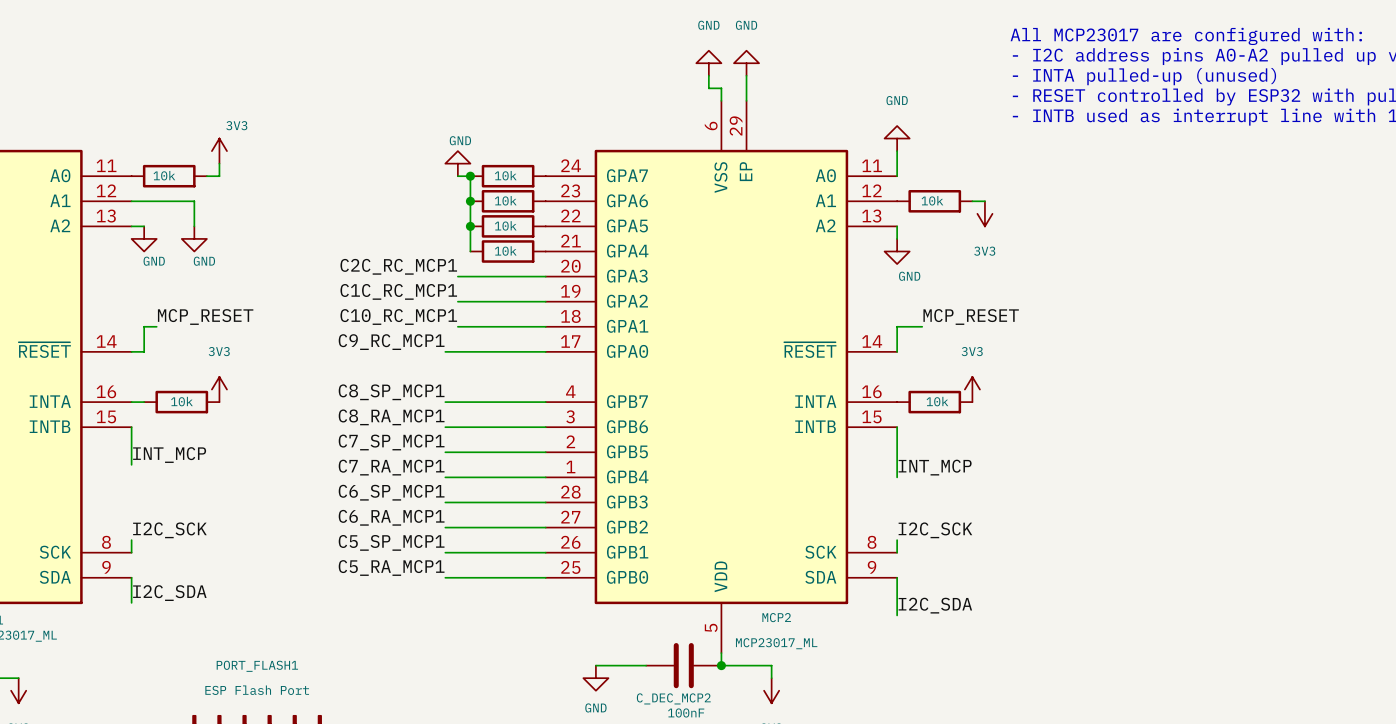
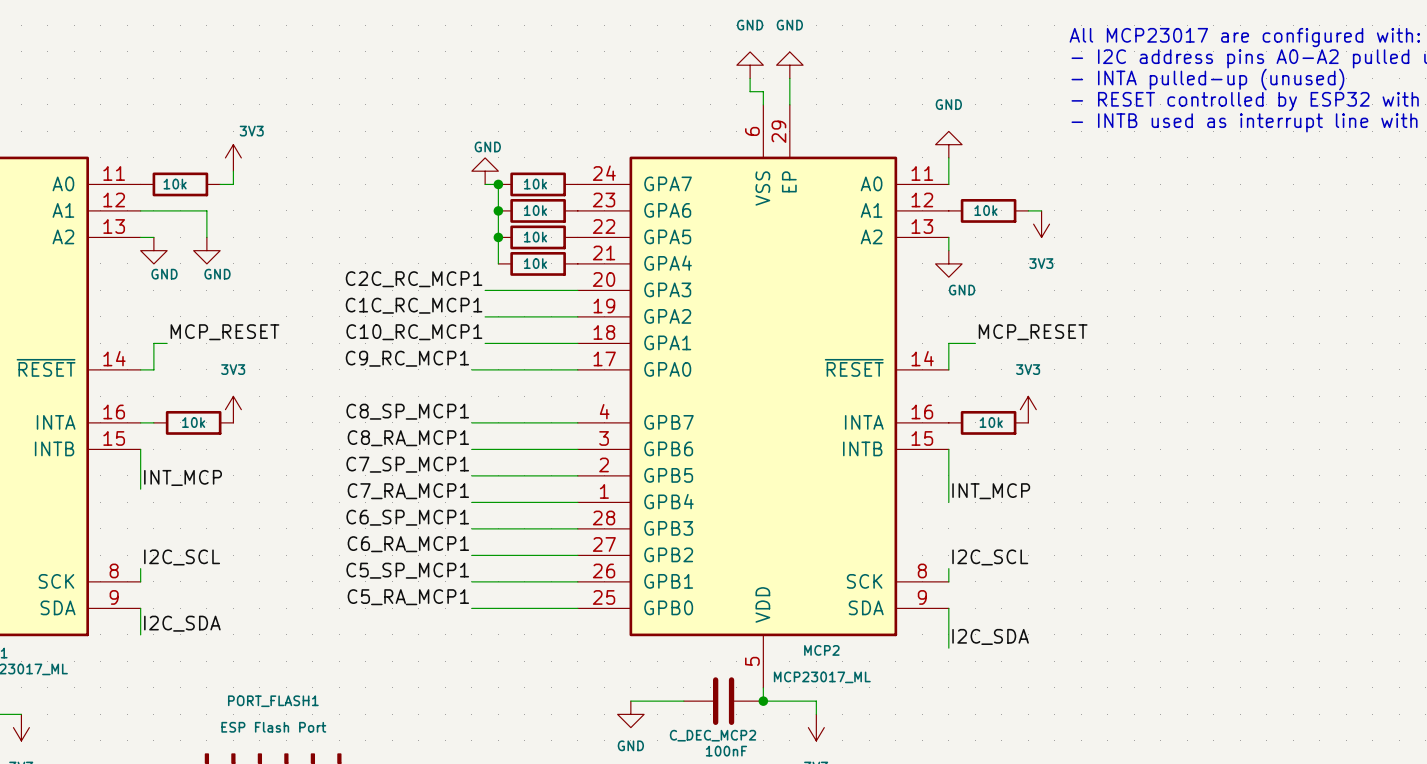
label: I2C_SCK (169, 530) -> I2C_SCL (182, 557)
label: I2C_SCK (935, 530) -> I2C_SCL (990, 557)

